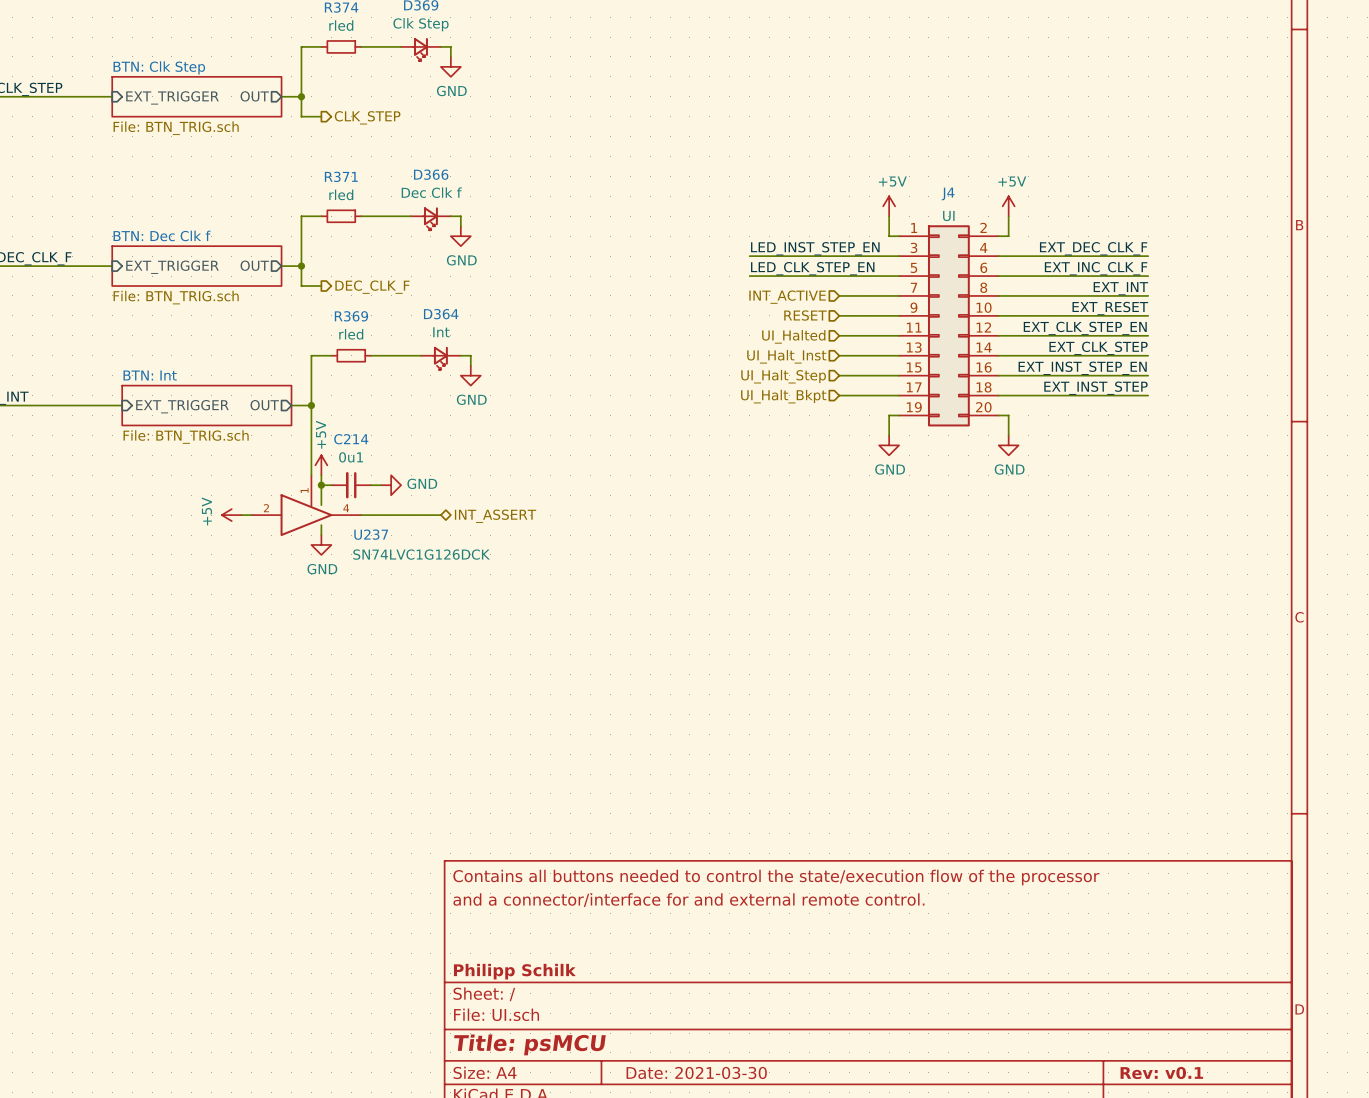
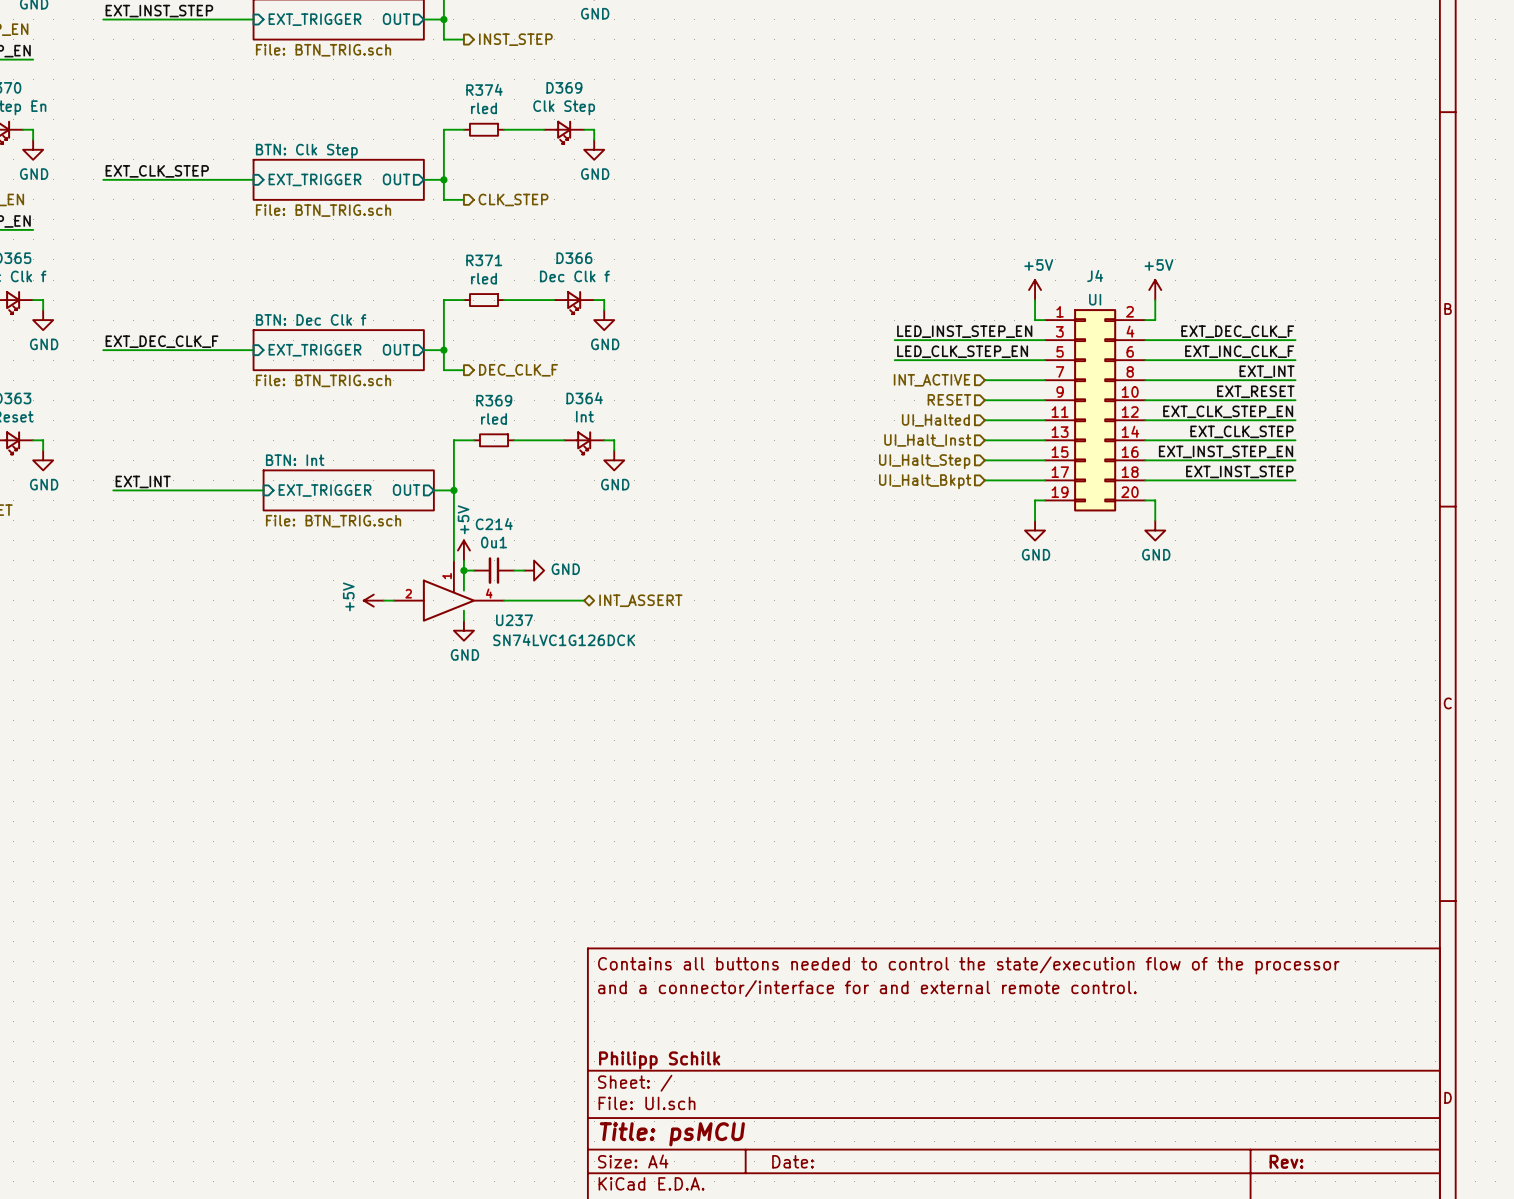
title block: Date: 2021-03-30 (696, 1072) -> Date: (792, 1161)
title block: Rev: v0.1 (1161, 1072) -> Rev: (1286, 1161)

